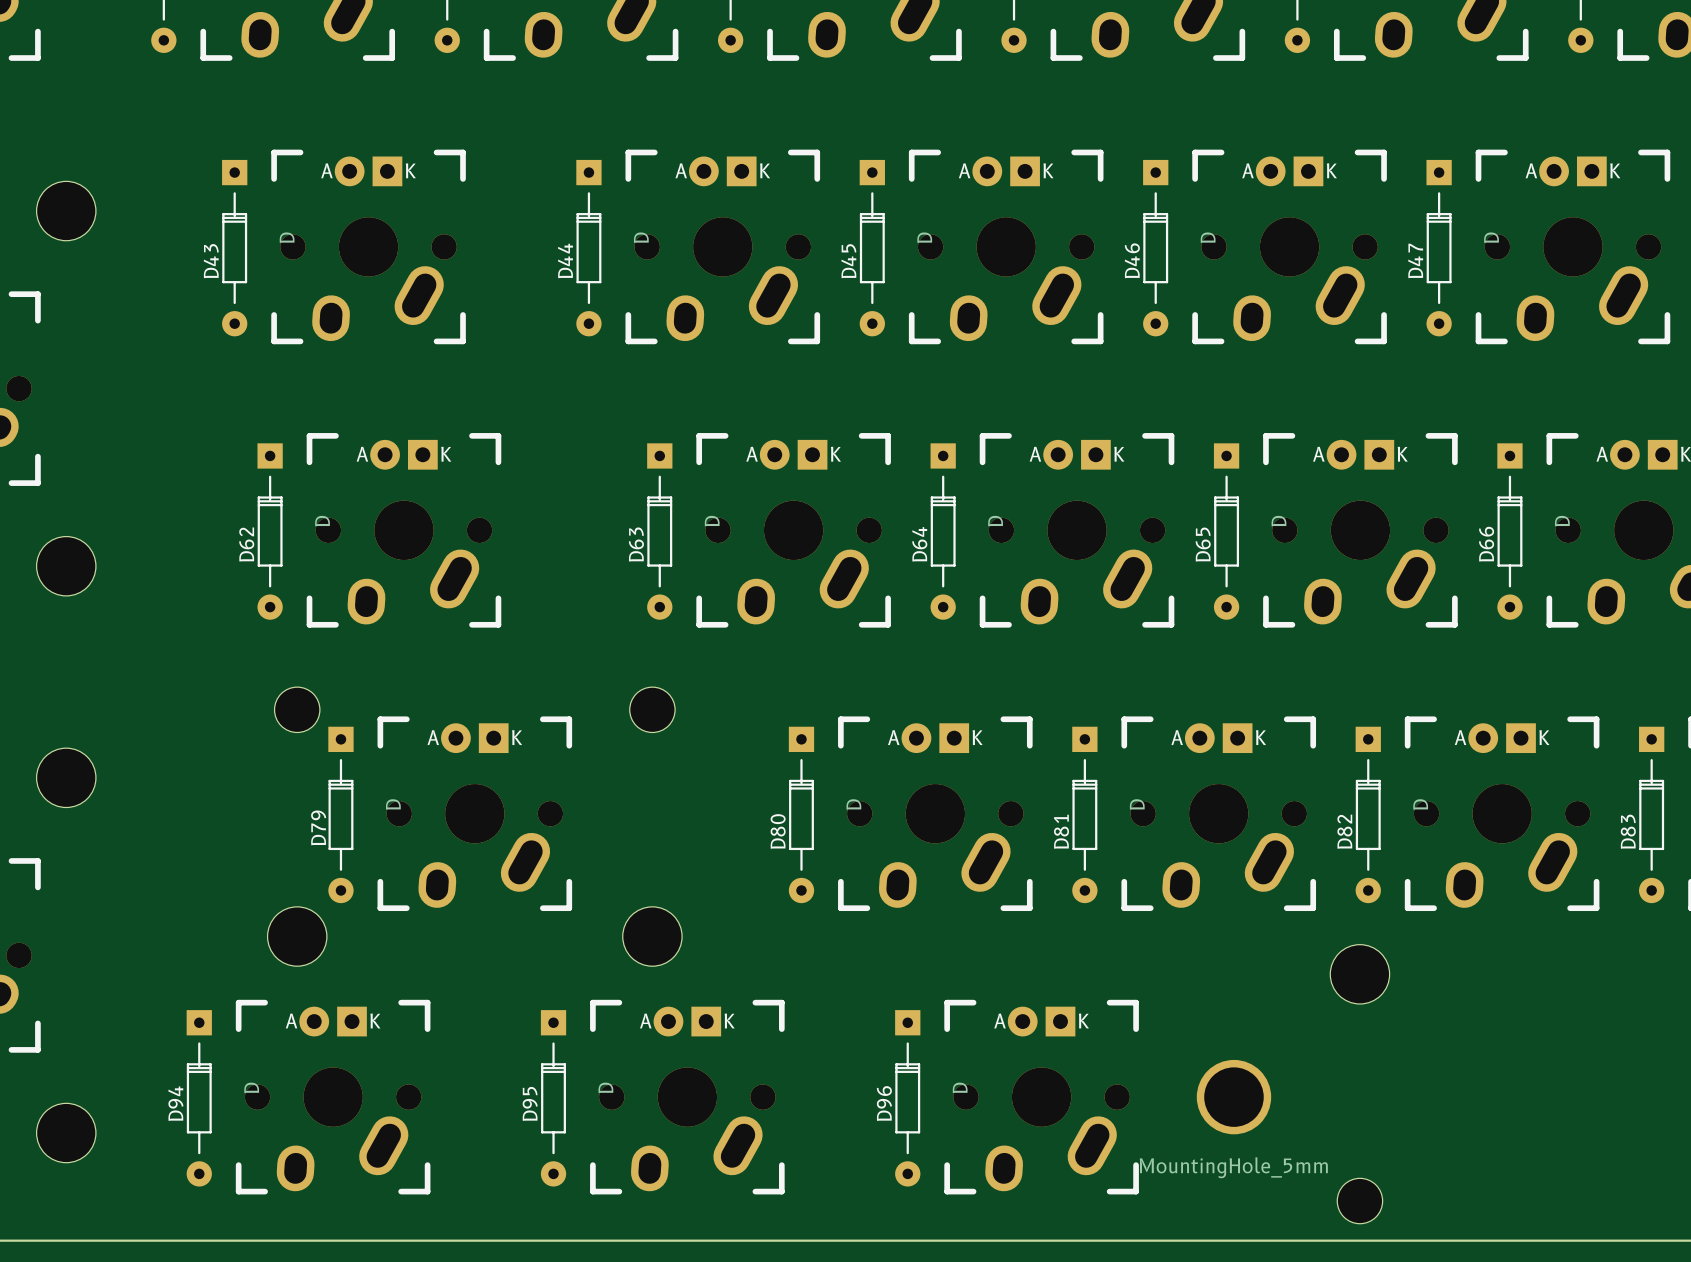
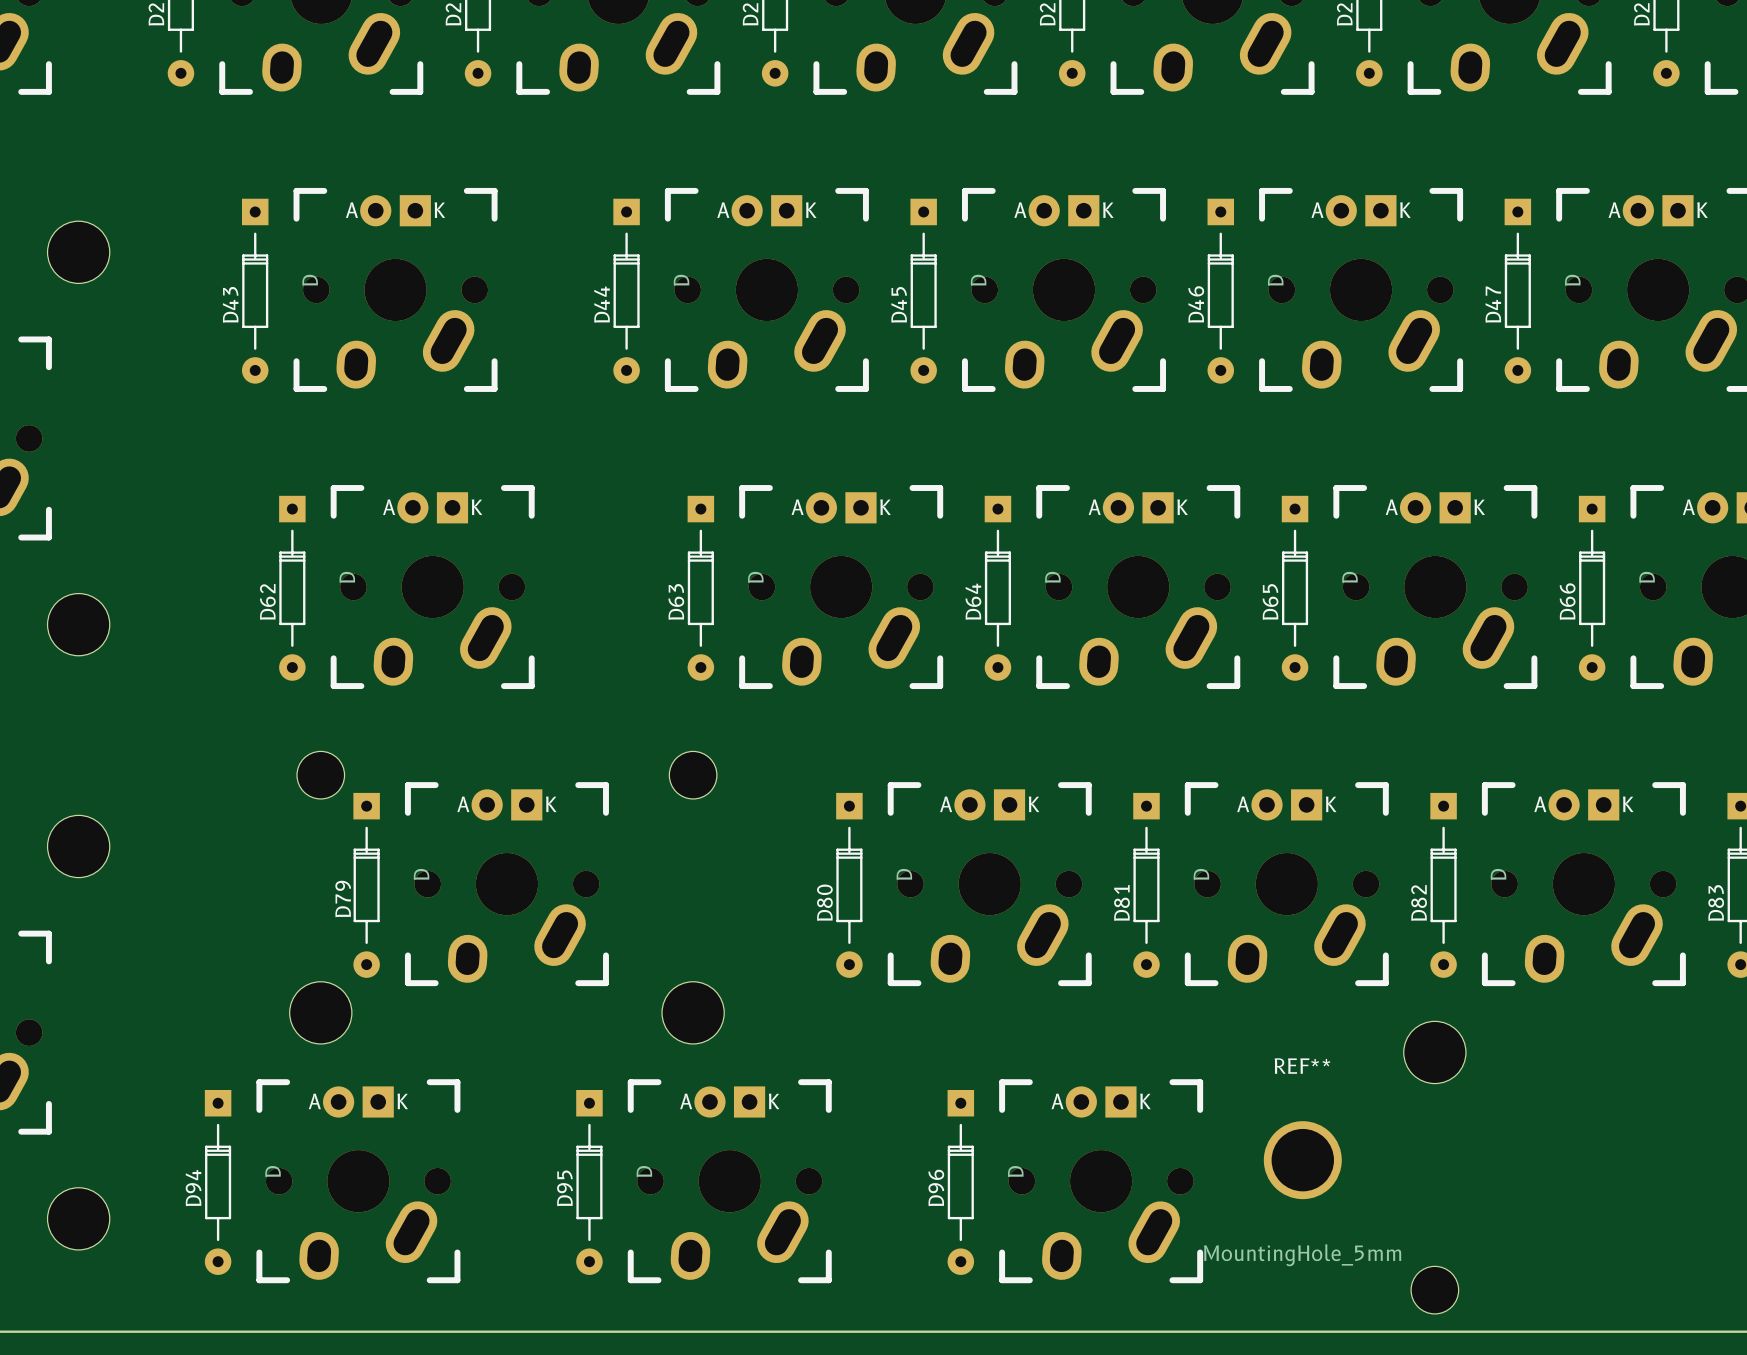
REF**: none -> MountingHole_5mm (1302, 1160)
part: MountingHole_5mm (1233, 1097) -> none

